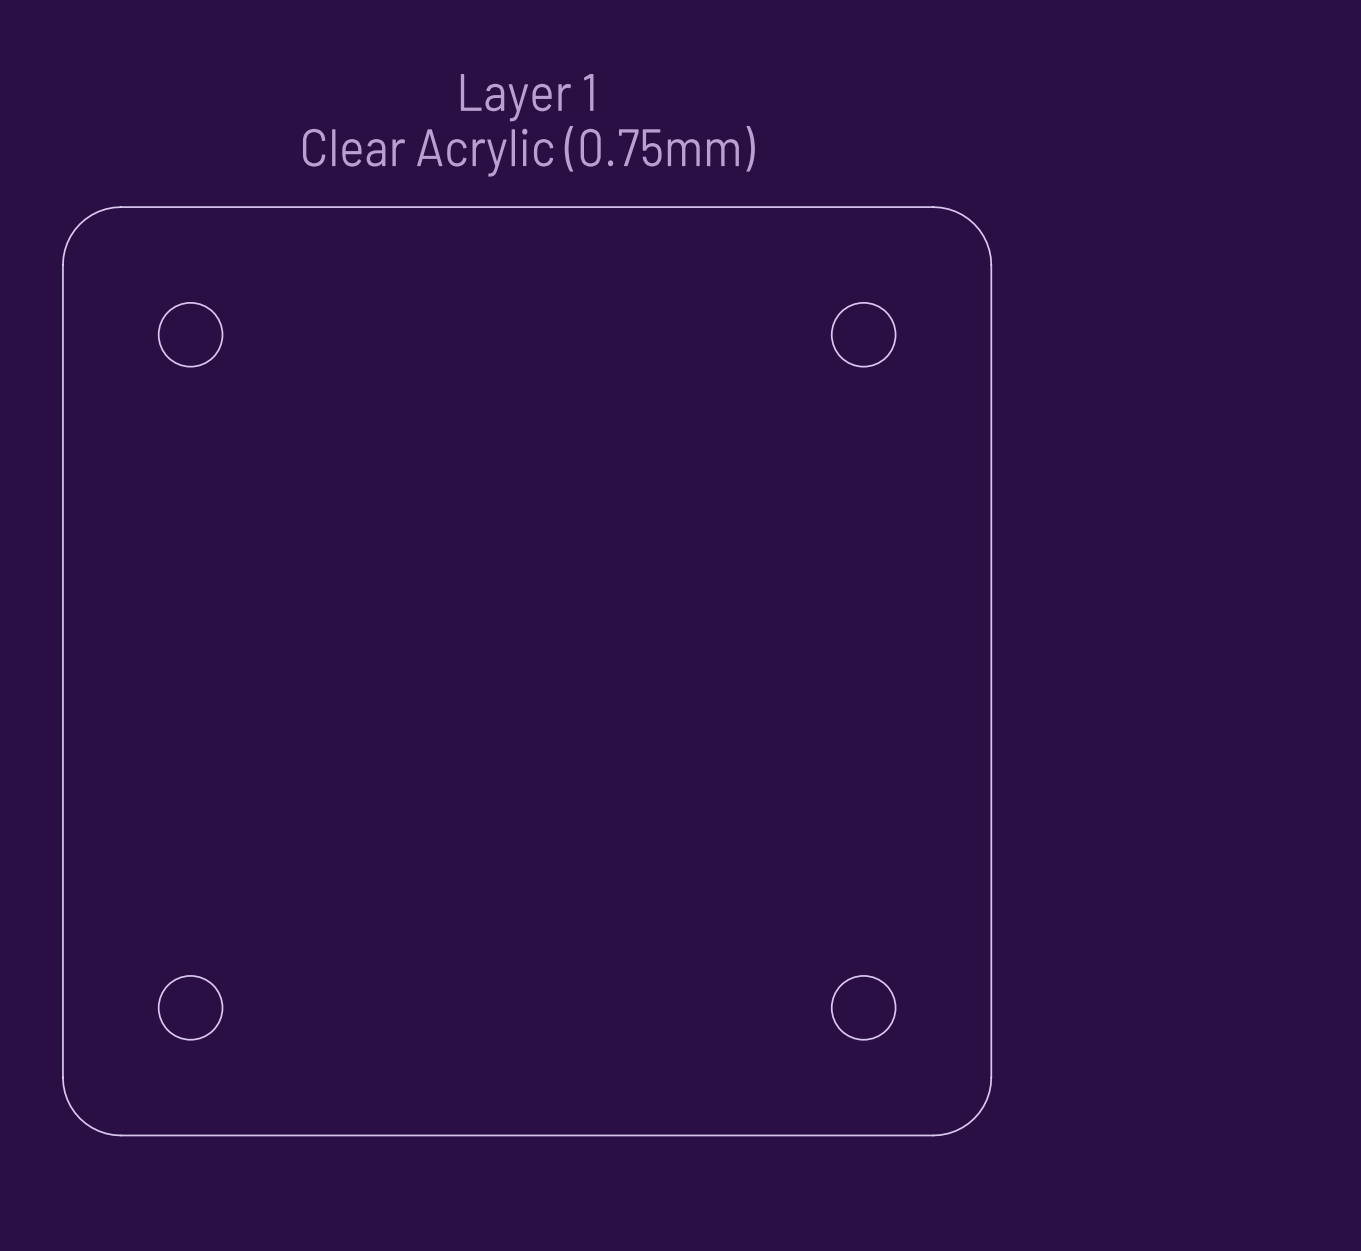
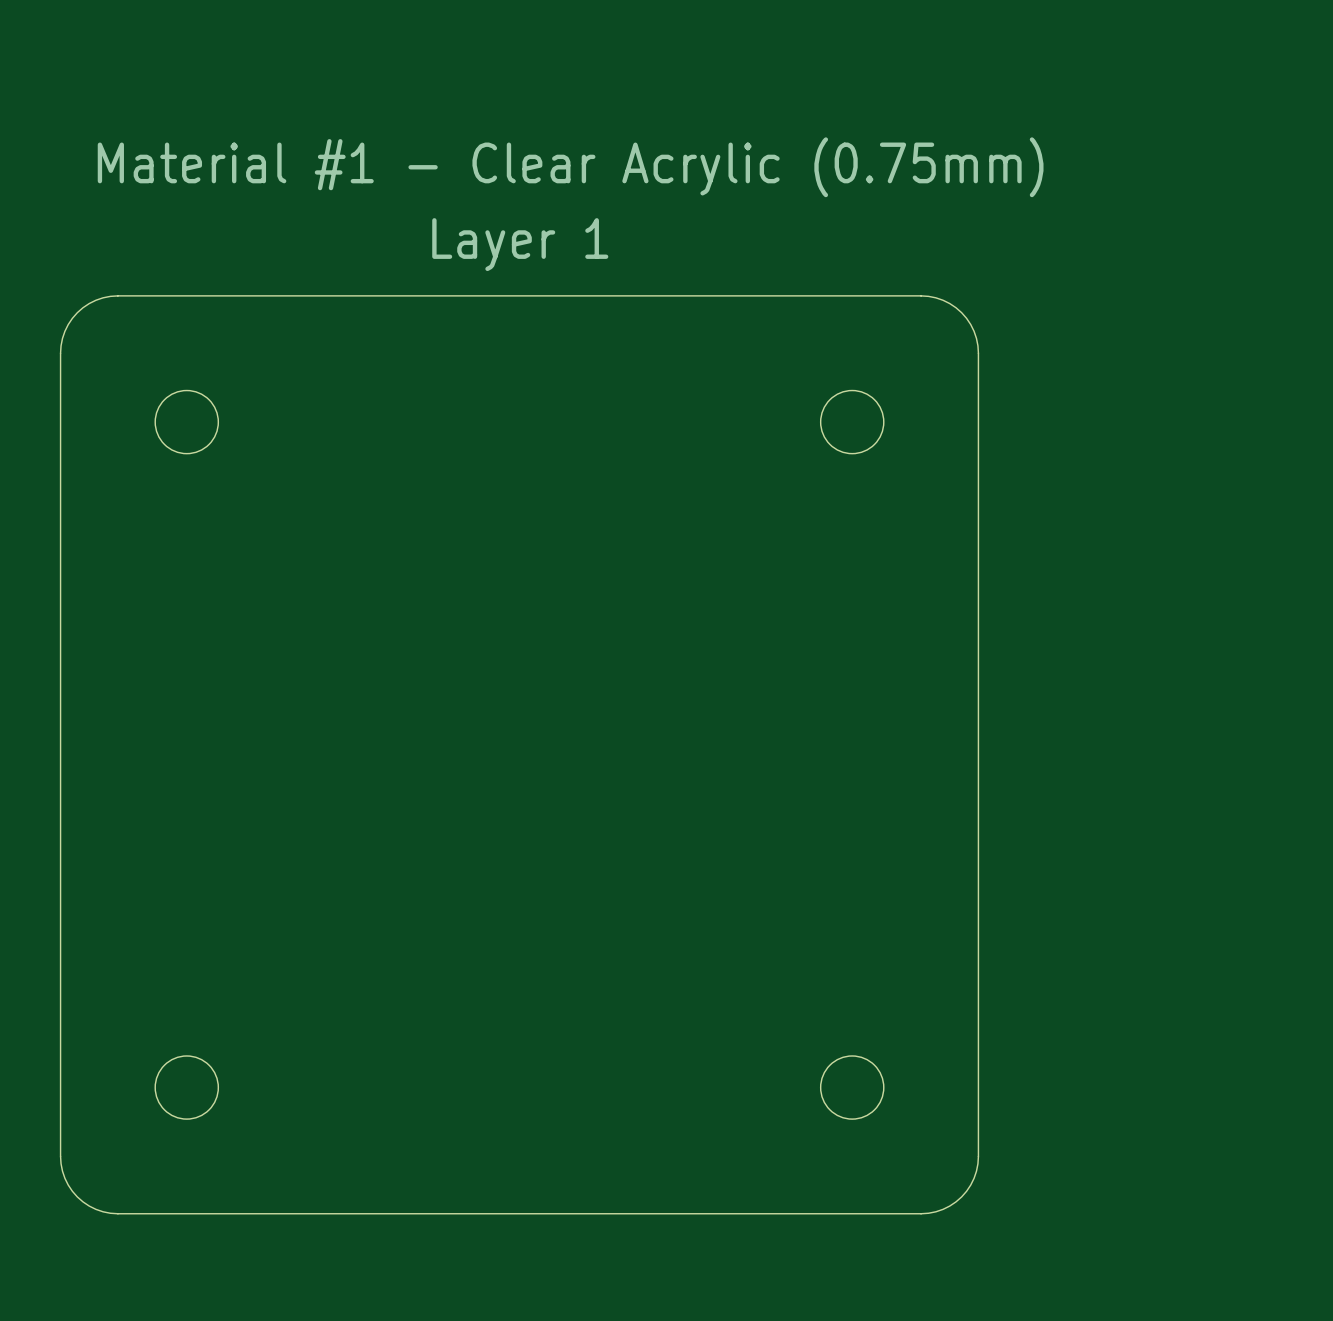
text: none -> Material #1 - Clear Acrylic (0.75mm) (570, 167)
text: Layer 1 (527, 97) -> none
text: Clear Acrylic (0.75mm) (528, 151) -> Layer 1 (520, 244)

